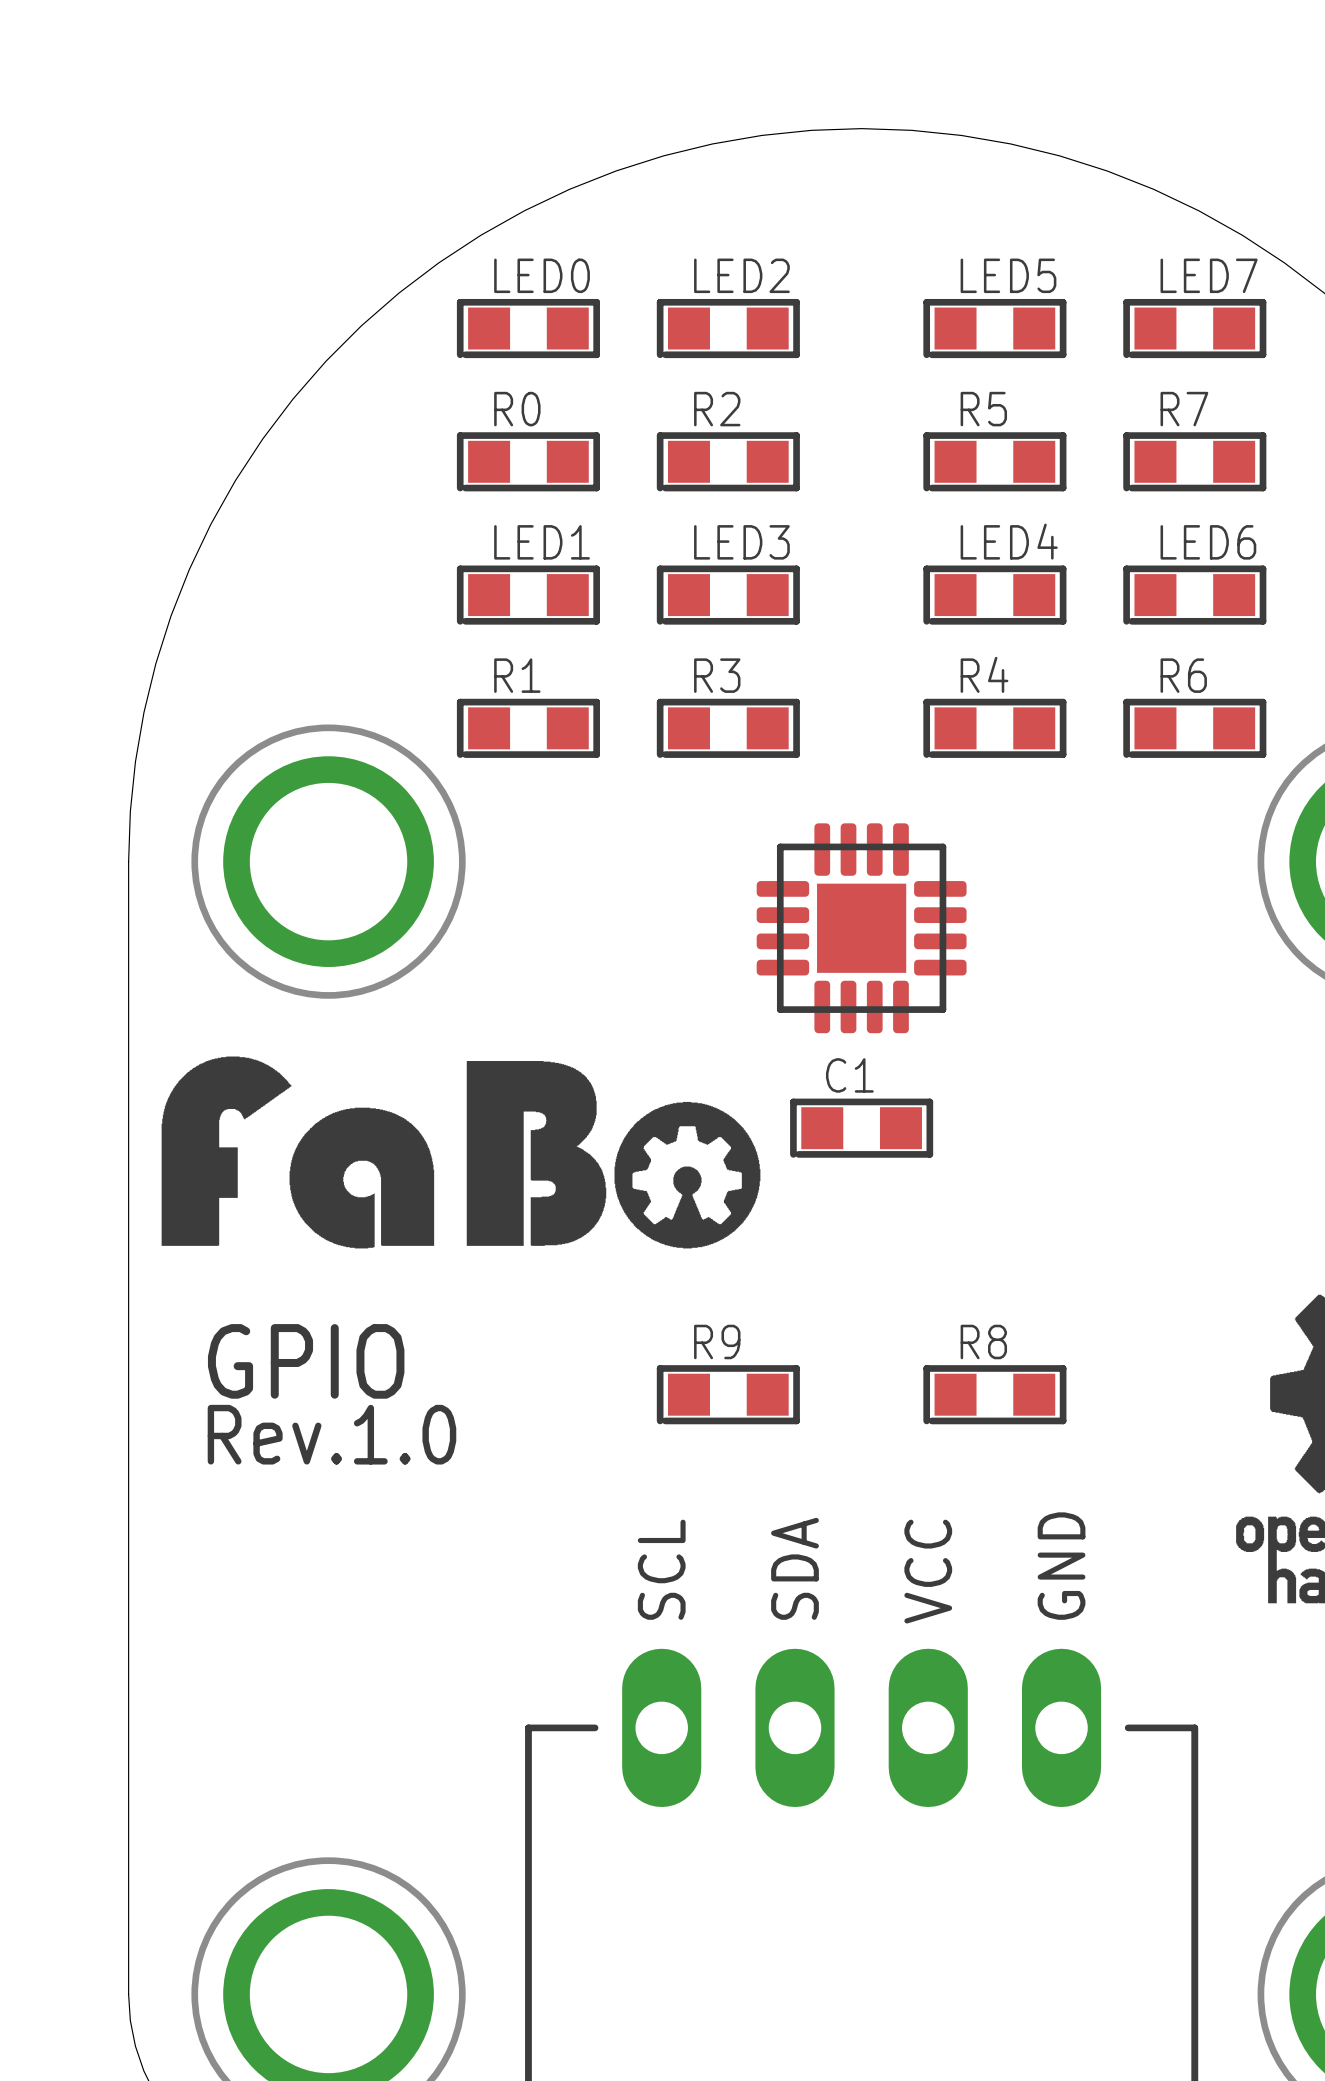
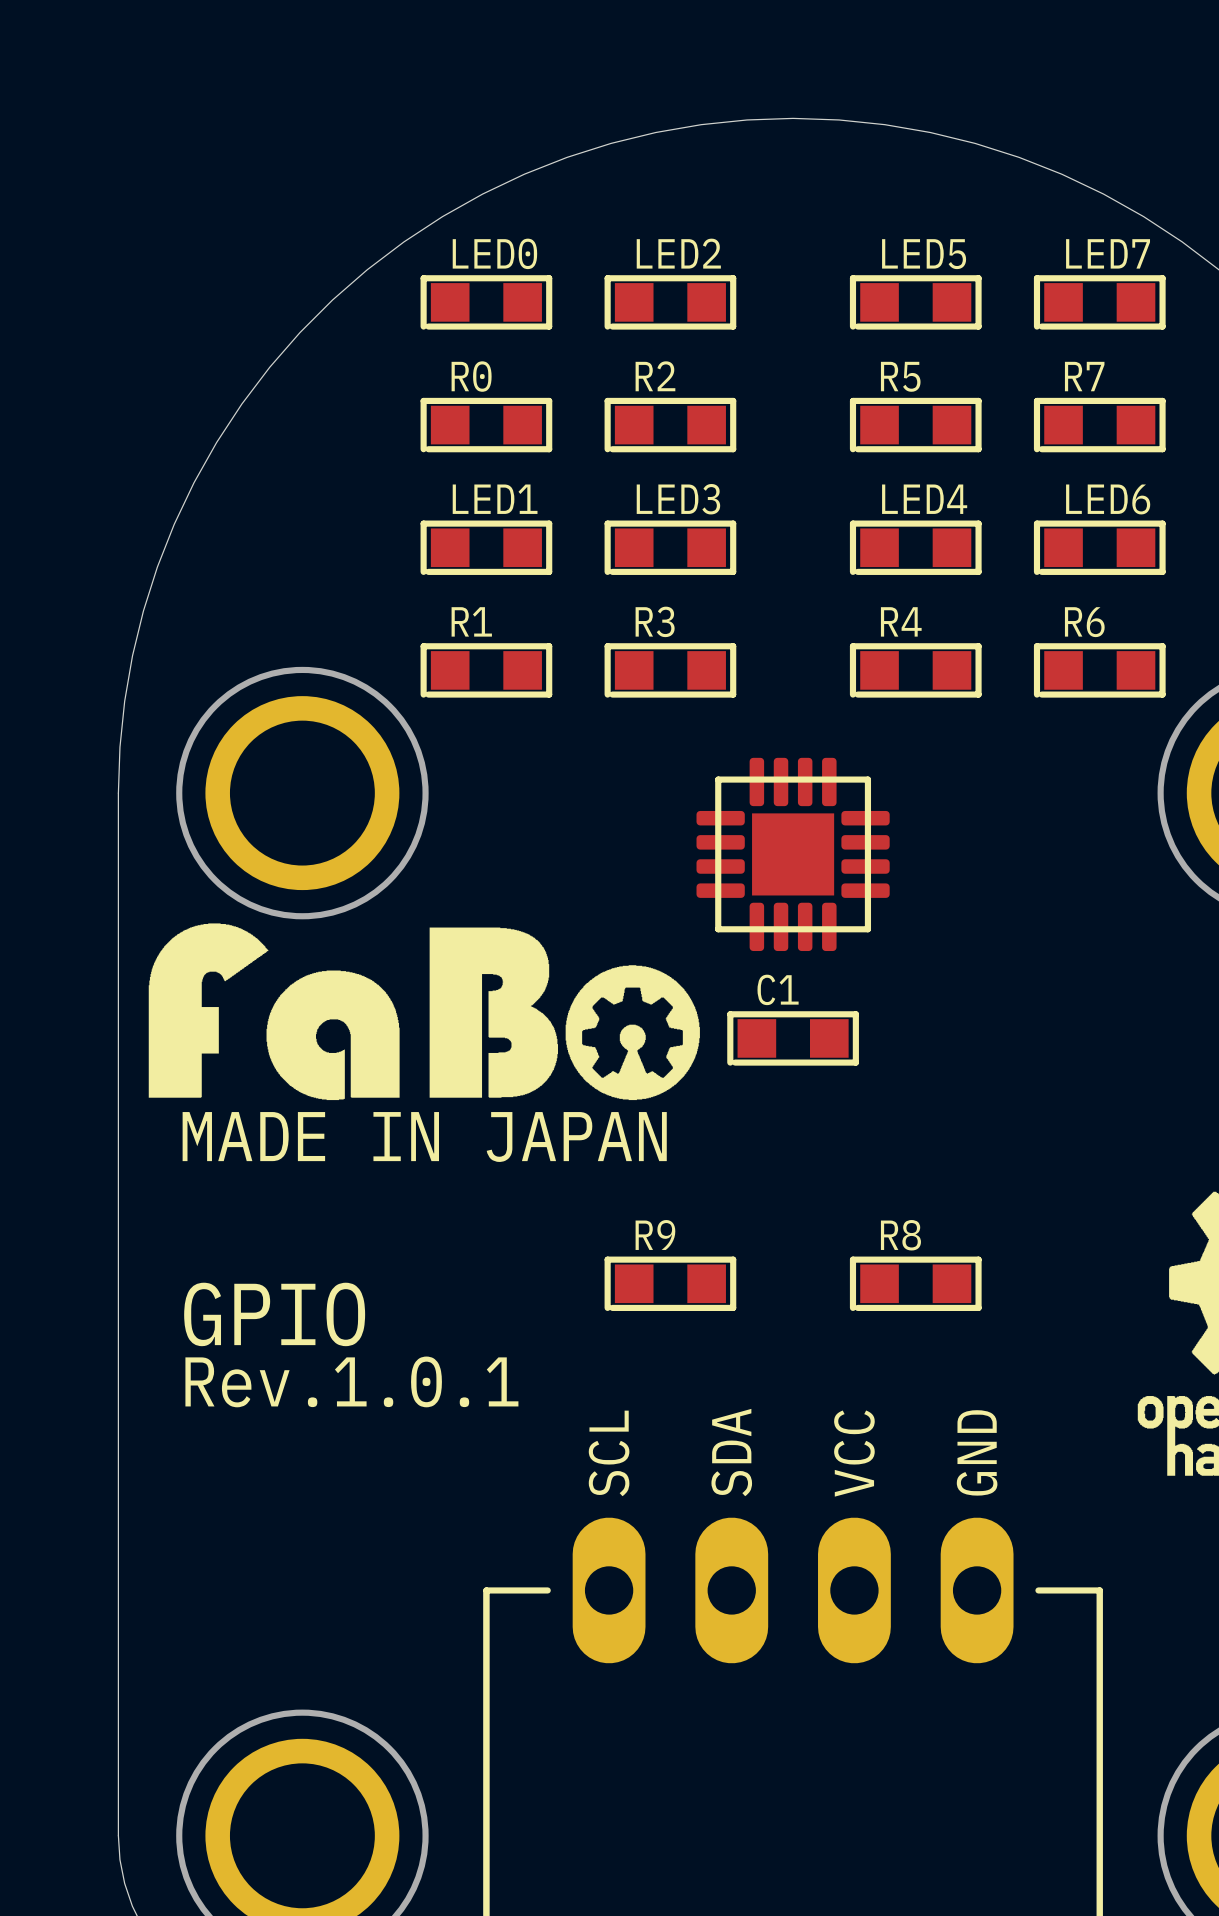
drawing position: (461, 1152) -> (424, 1011)
text: none -> MADE IN JAPAN (424, 1137)
text: GPIO (306, 1361) -> none
text: Rev.1.0 (331, 1434) -> GPIO (274, 1314)
text: none -> Rev.1.0.1 (351, 1381)

